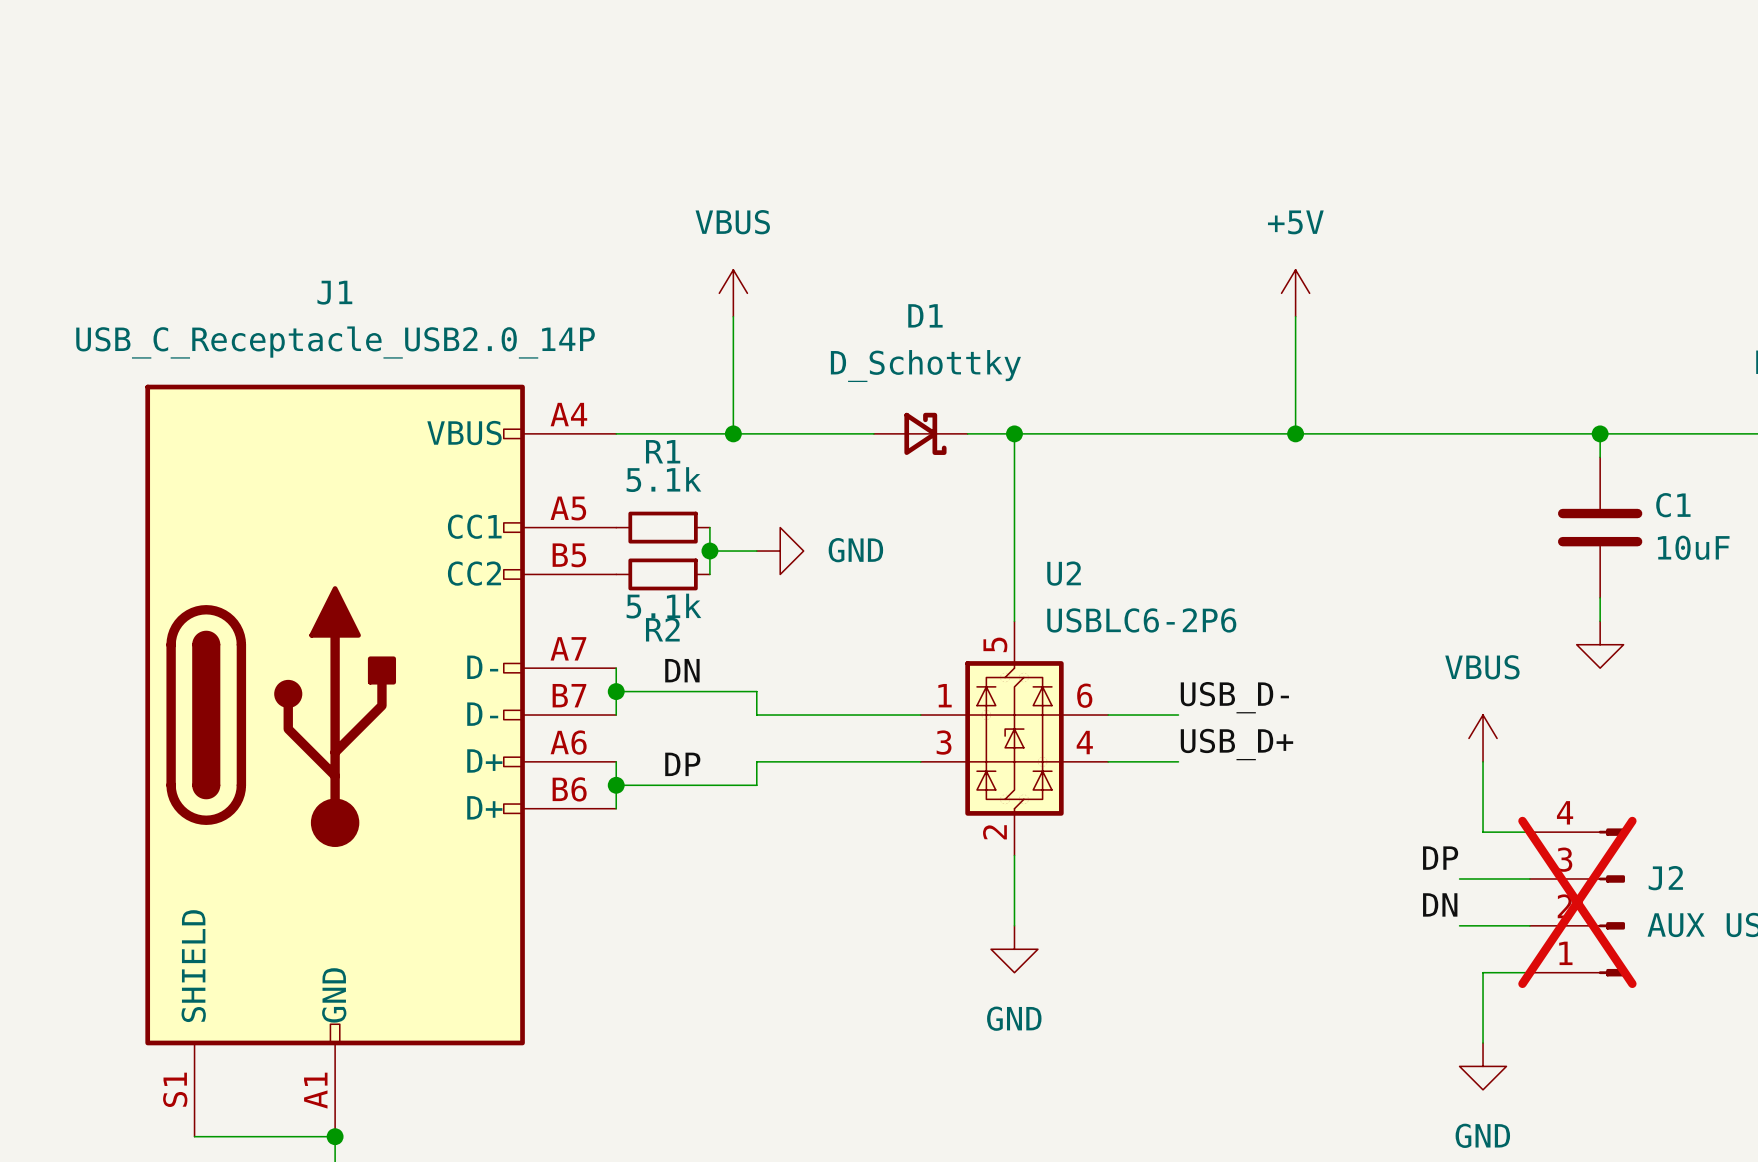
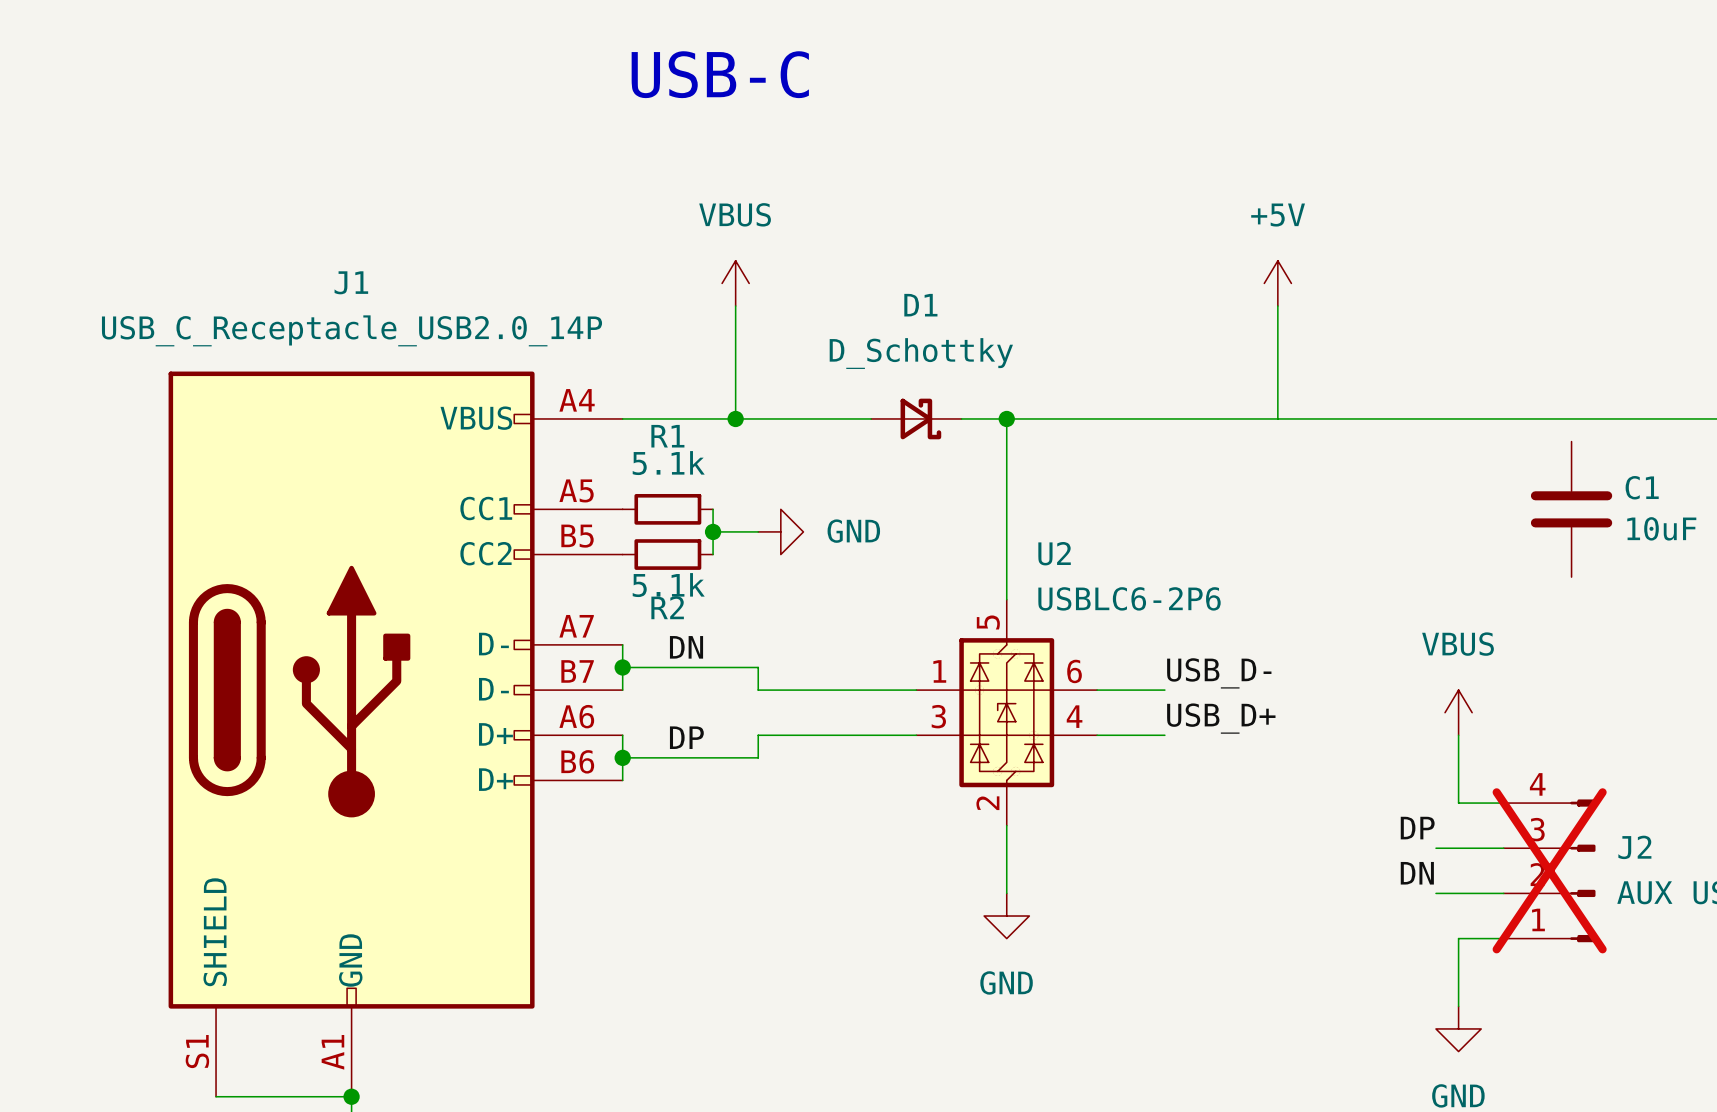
text: none -> USB-C (720, 74)
junction: (1295, 433) -> none
wire: (1600, 433) (1600, 457) -> none
junction: (1600, 433) -> none
wire: (1600, 597) (1600, 621) -> none
power symbol: (1600, 644) -> none

